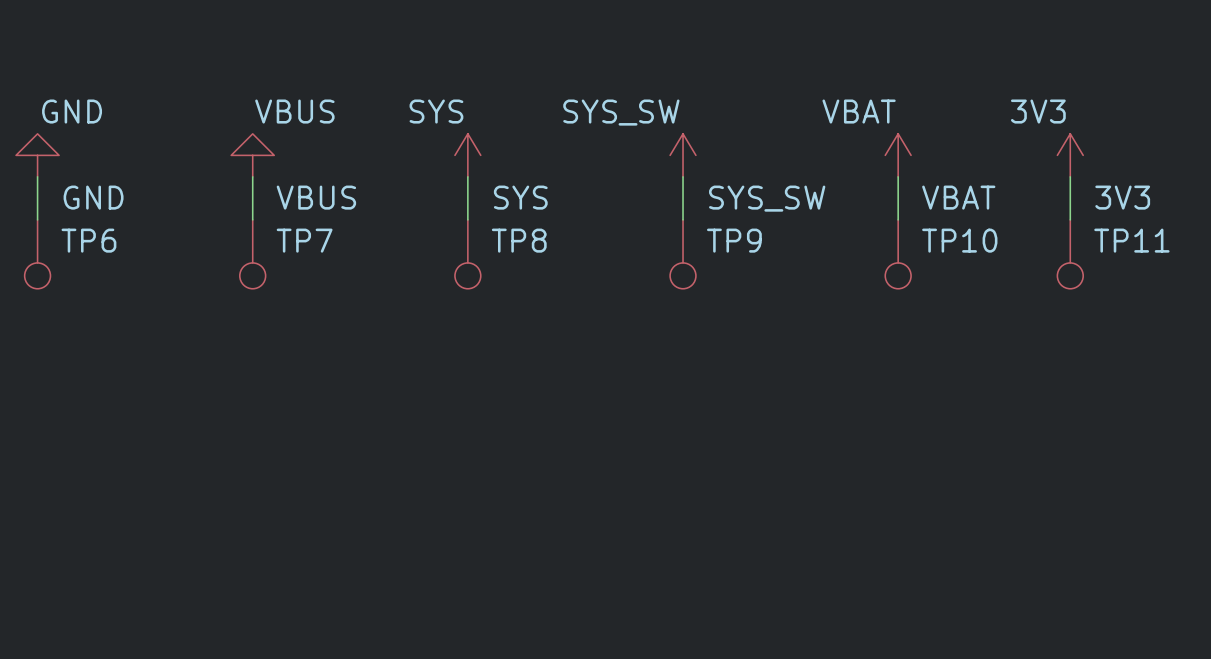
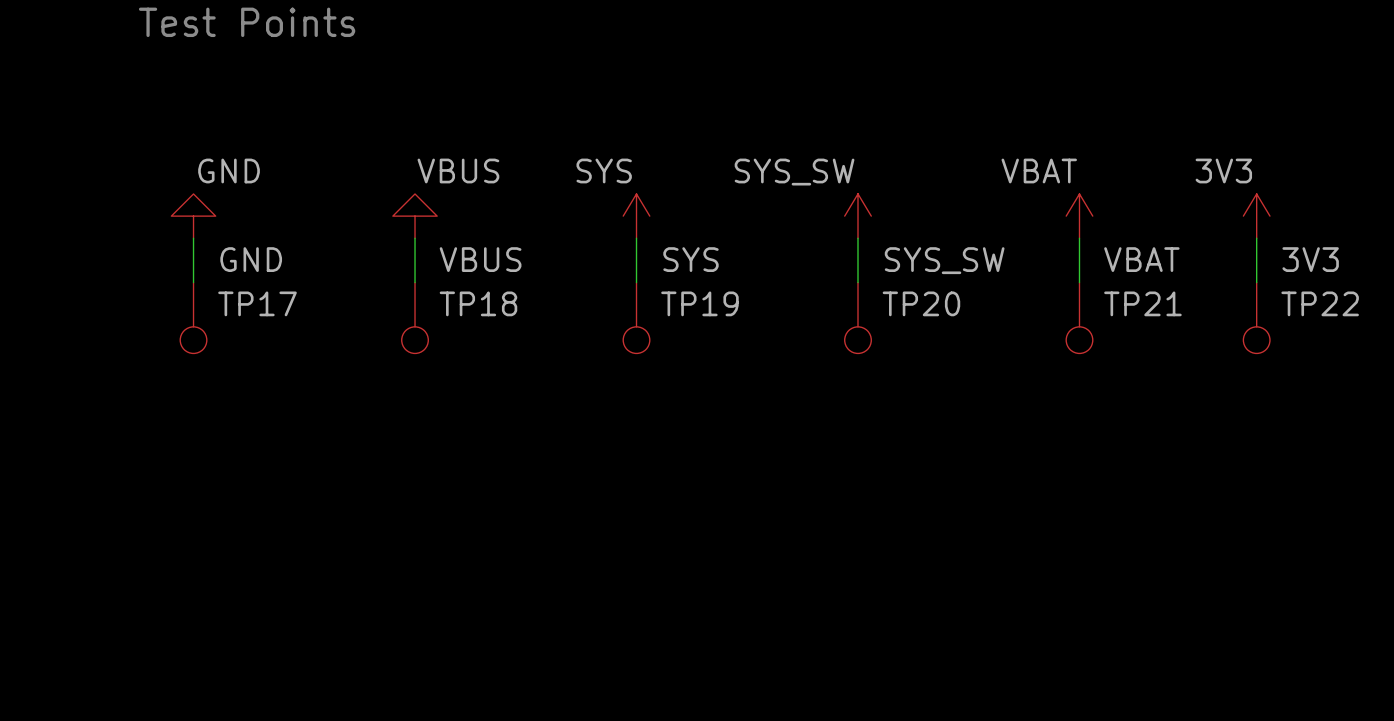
TP6 name: TP6 (88, 240) -> TP17 (257, 303)
TP7 name: TP7 (304, 240) -> TP18 (478, 303)
TP8 name: TP8 (519, 240) -> TP19 (699, 303)
TP9 name: TP9 (734, 240) -> TP20 (921, 303)
TP10 name: TP10 (959, 240) -> TP21 (1142, 303)
TP11 name: TP11 (1131, 240) -> TP22 (1320, 303)

